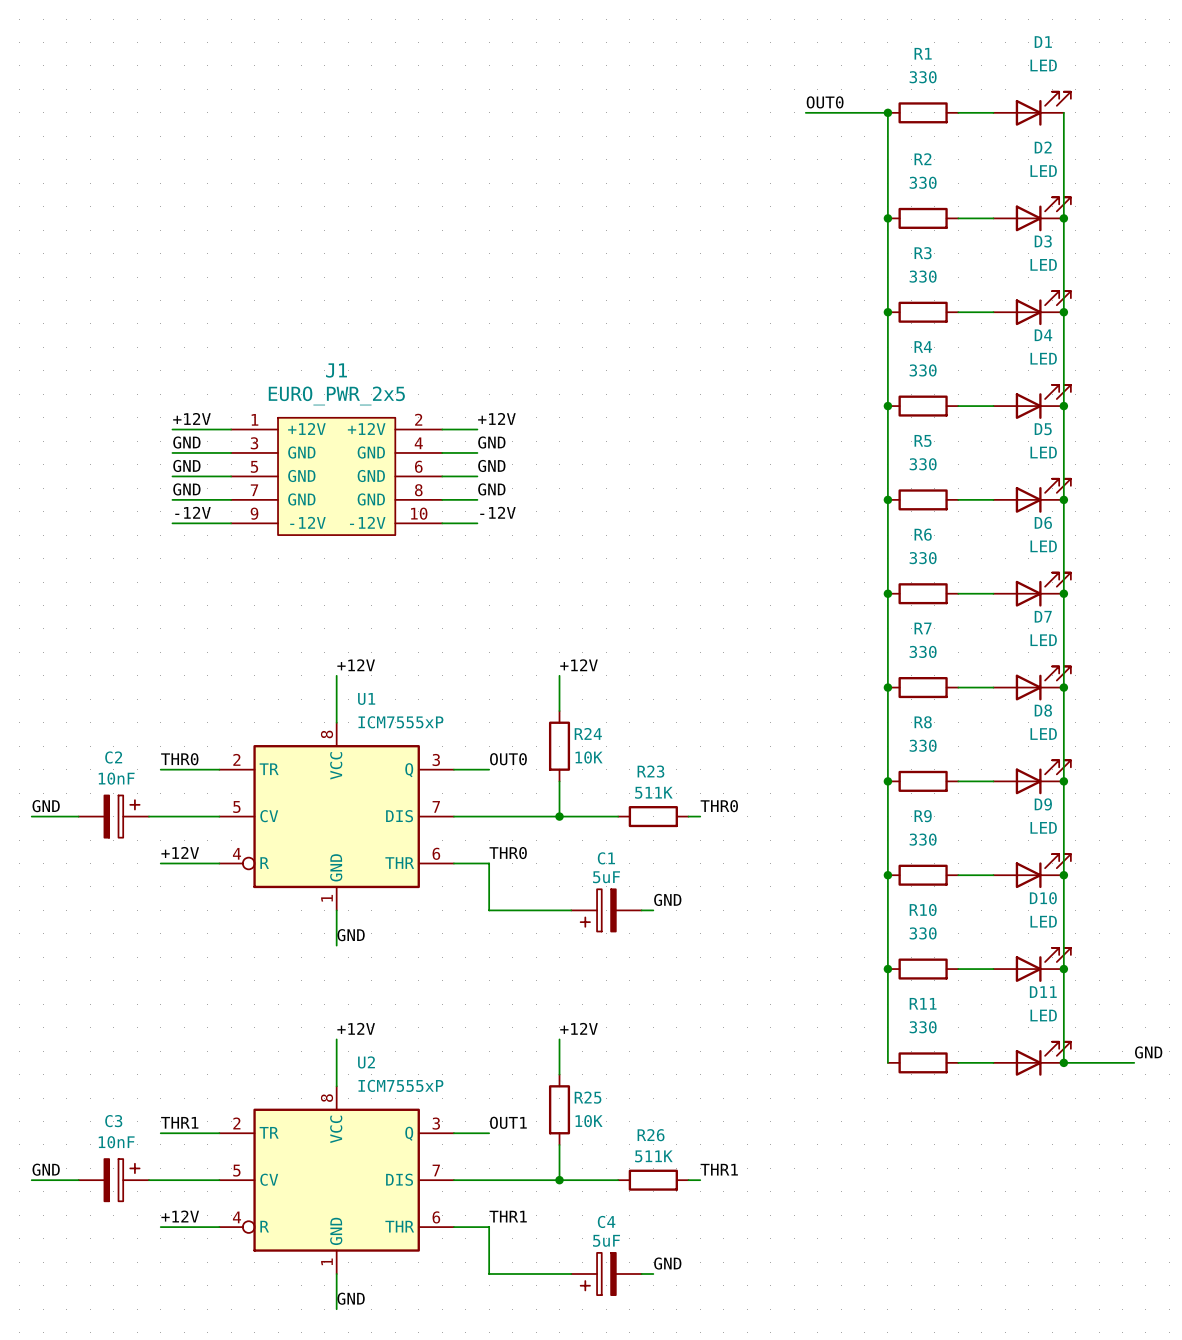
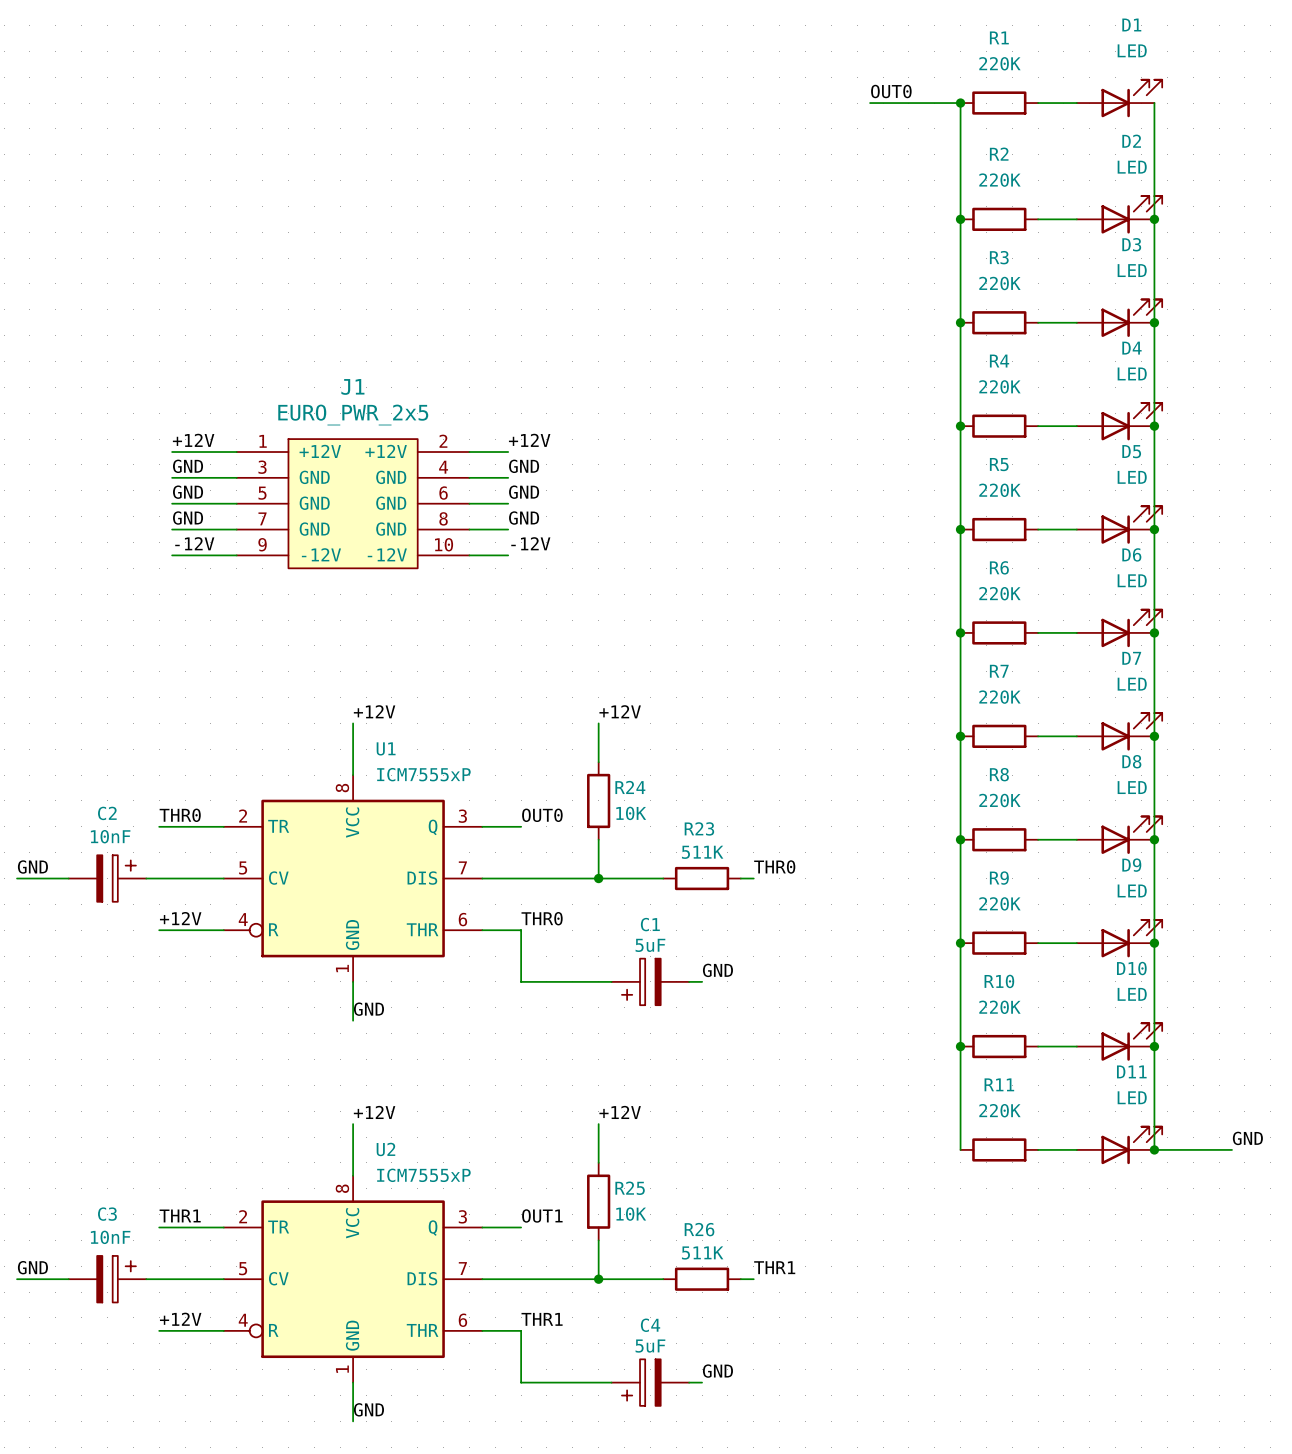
R1 value: 330 (923, 77) -> 220K (999, 63)
R2 value: 330 (923, 182) -> 220K (999, 180)
R3 value: 330 (923, 276) -> 220K (999, 283)
R4 value: 330 (923, 370) -> 220K (999, 386)
R5 value: 330 (923, 464) -> 220K (999, 490)
R6 value: 330 (923, 558) -> 220K (999, 593)
R7 value: 330 (923, 651) -> 220K (999, 697)
R8 value: 330 (923, 745) -> 220K (999, 800)
R9 value: 330 (923, 839) -> 220K (999, 903)
R10 value: 330 (923, 933) -> 220K (999, 1007)
R11 value: 330 (923, 1027) -> 220K (999, 1110)

